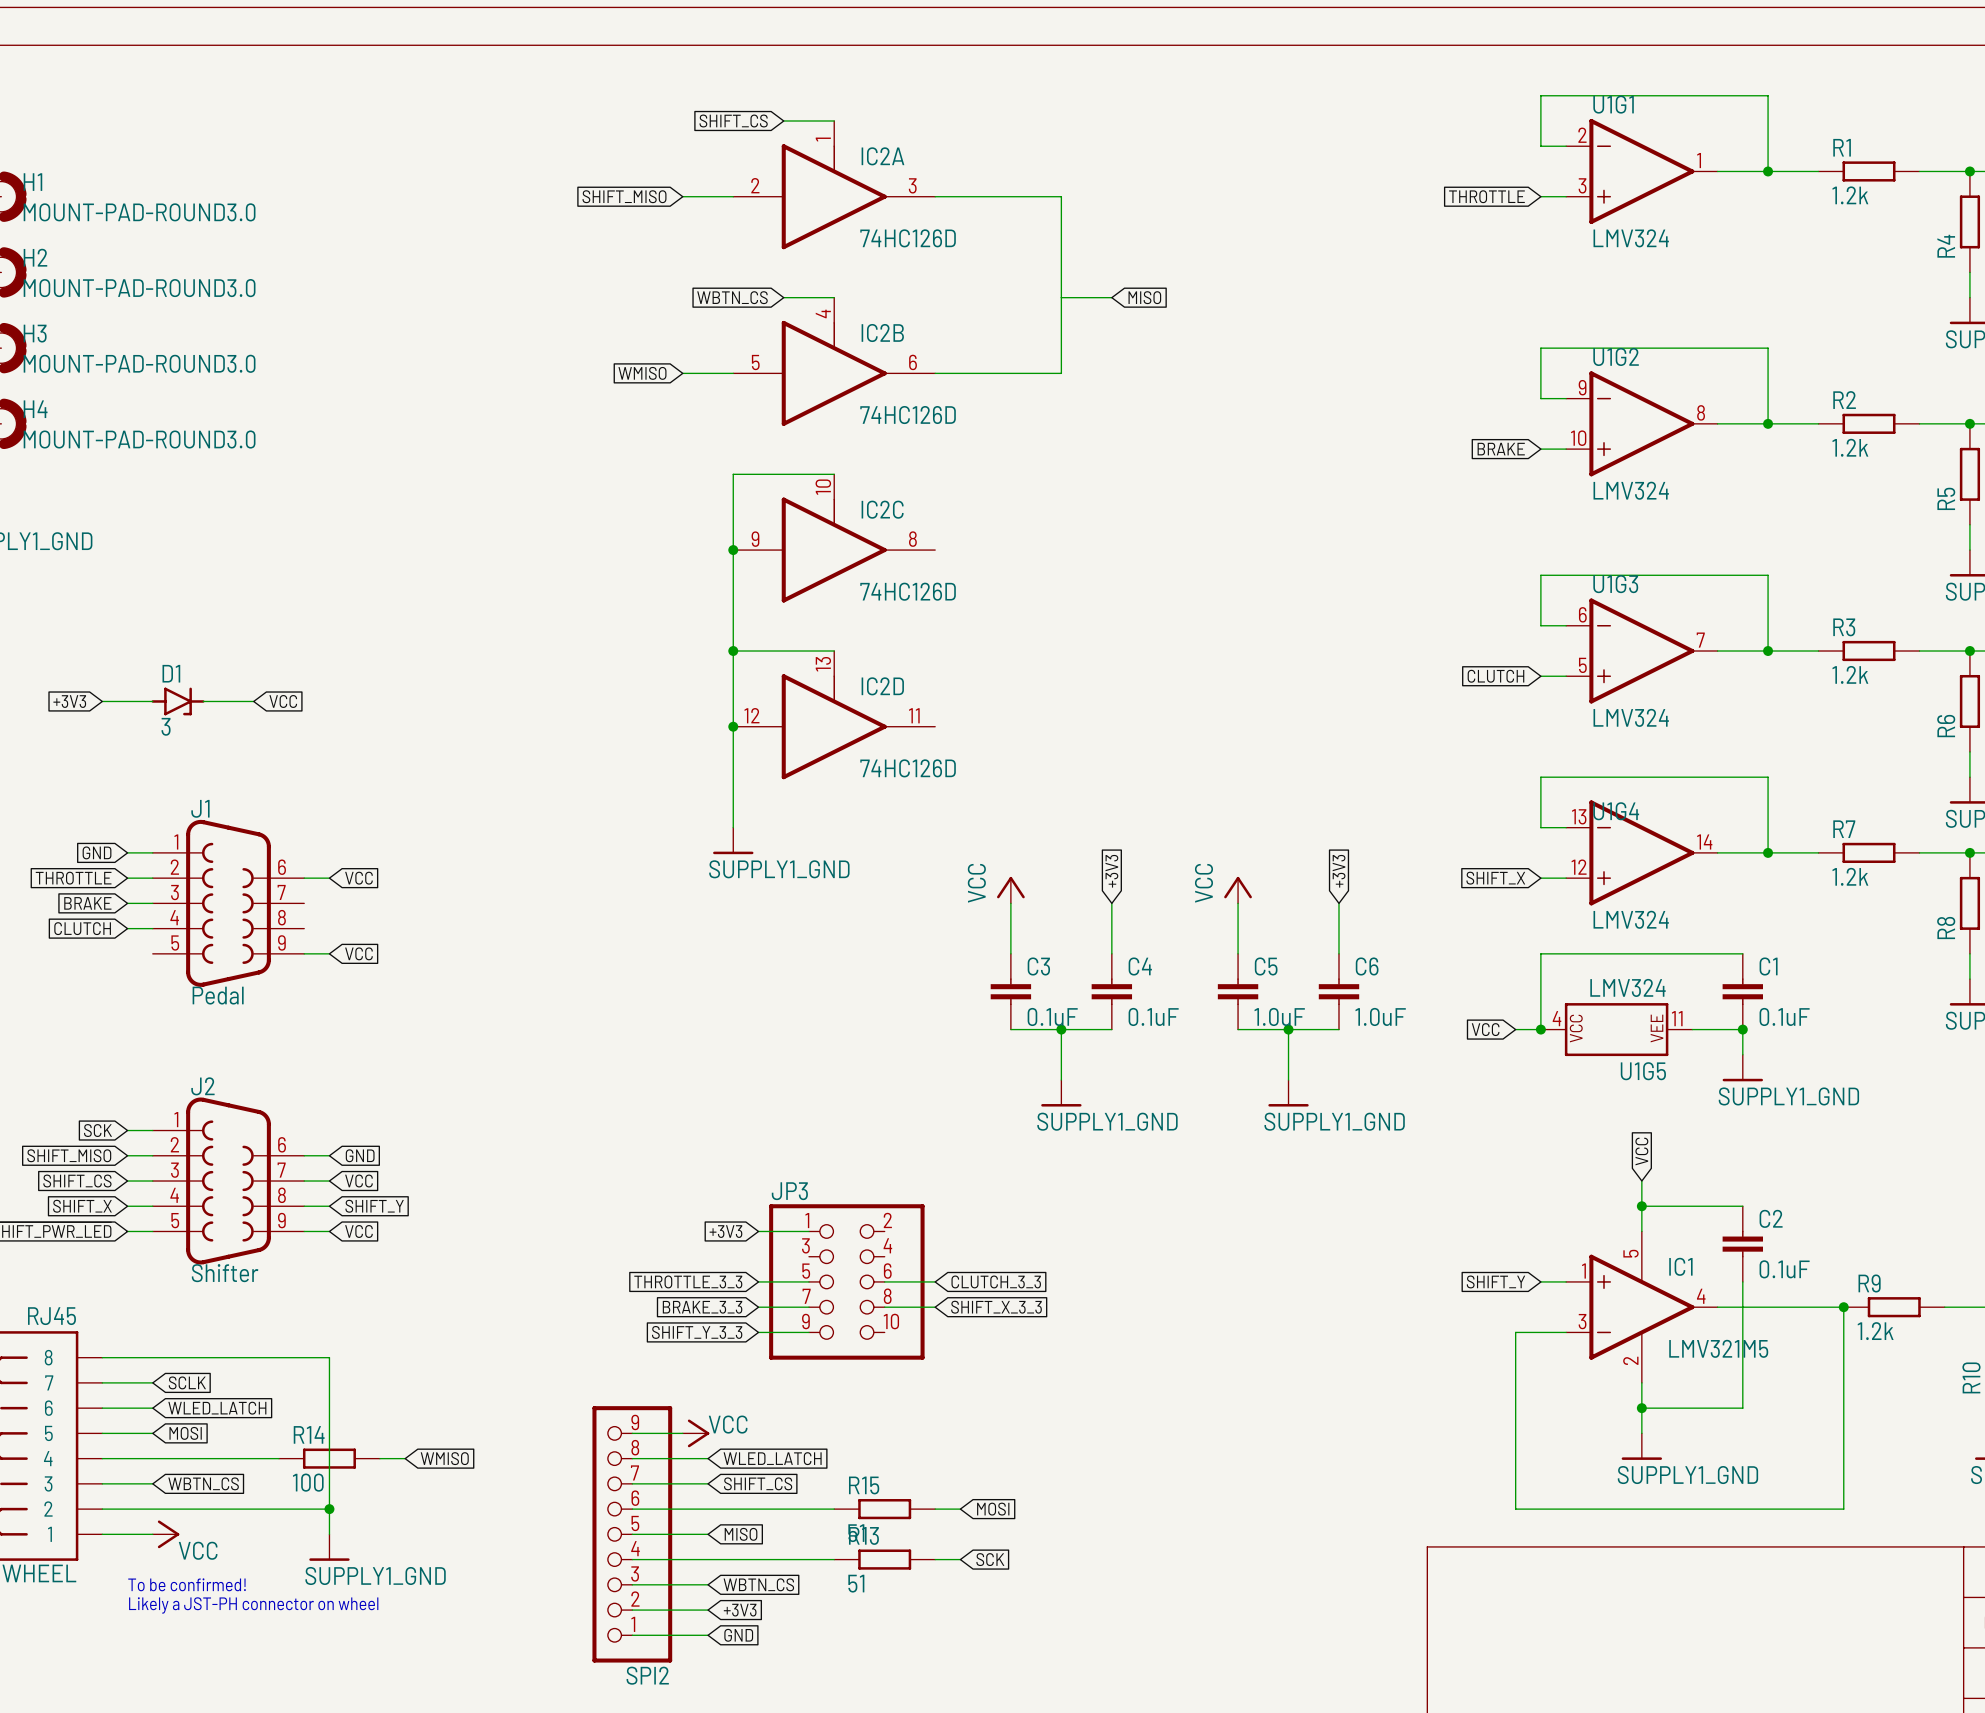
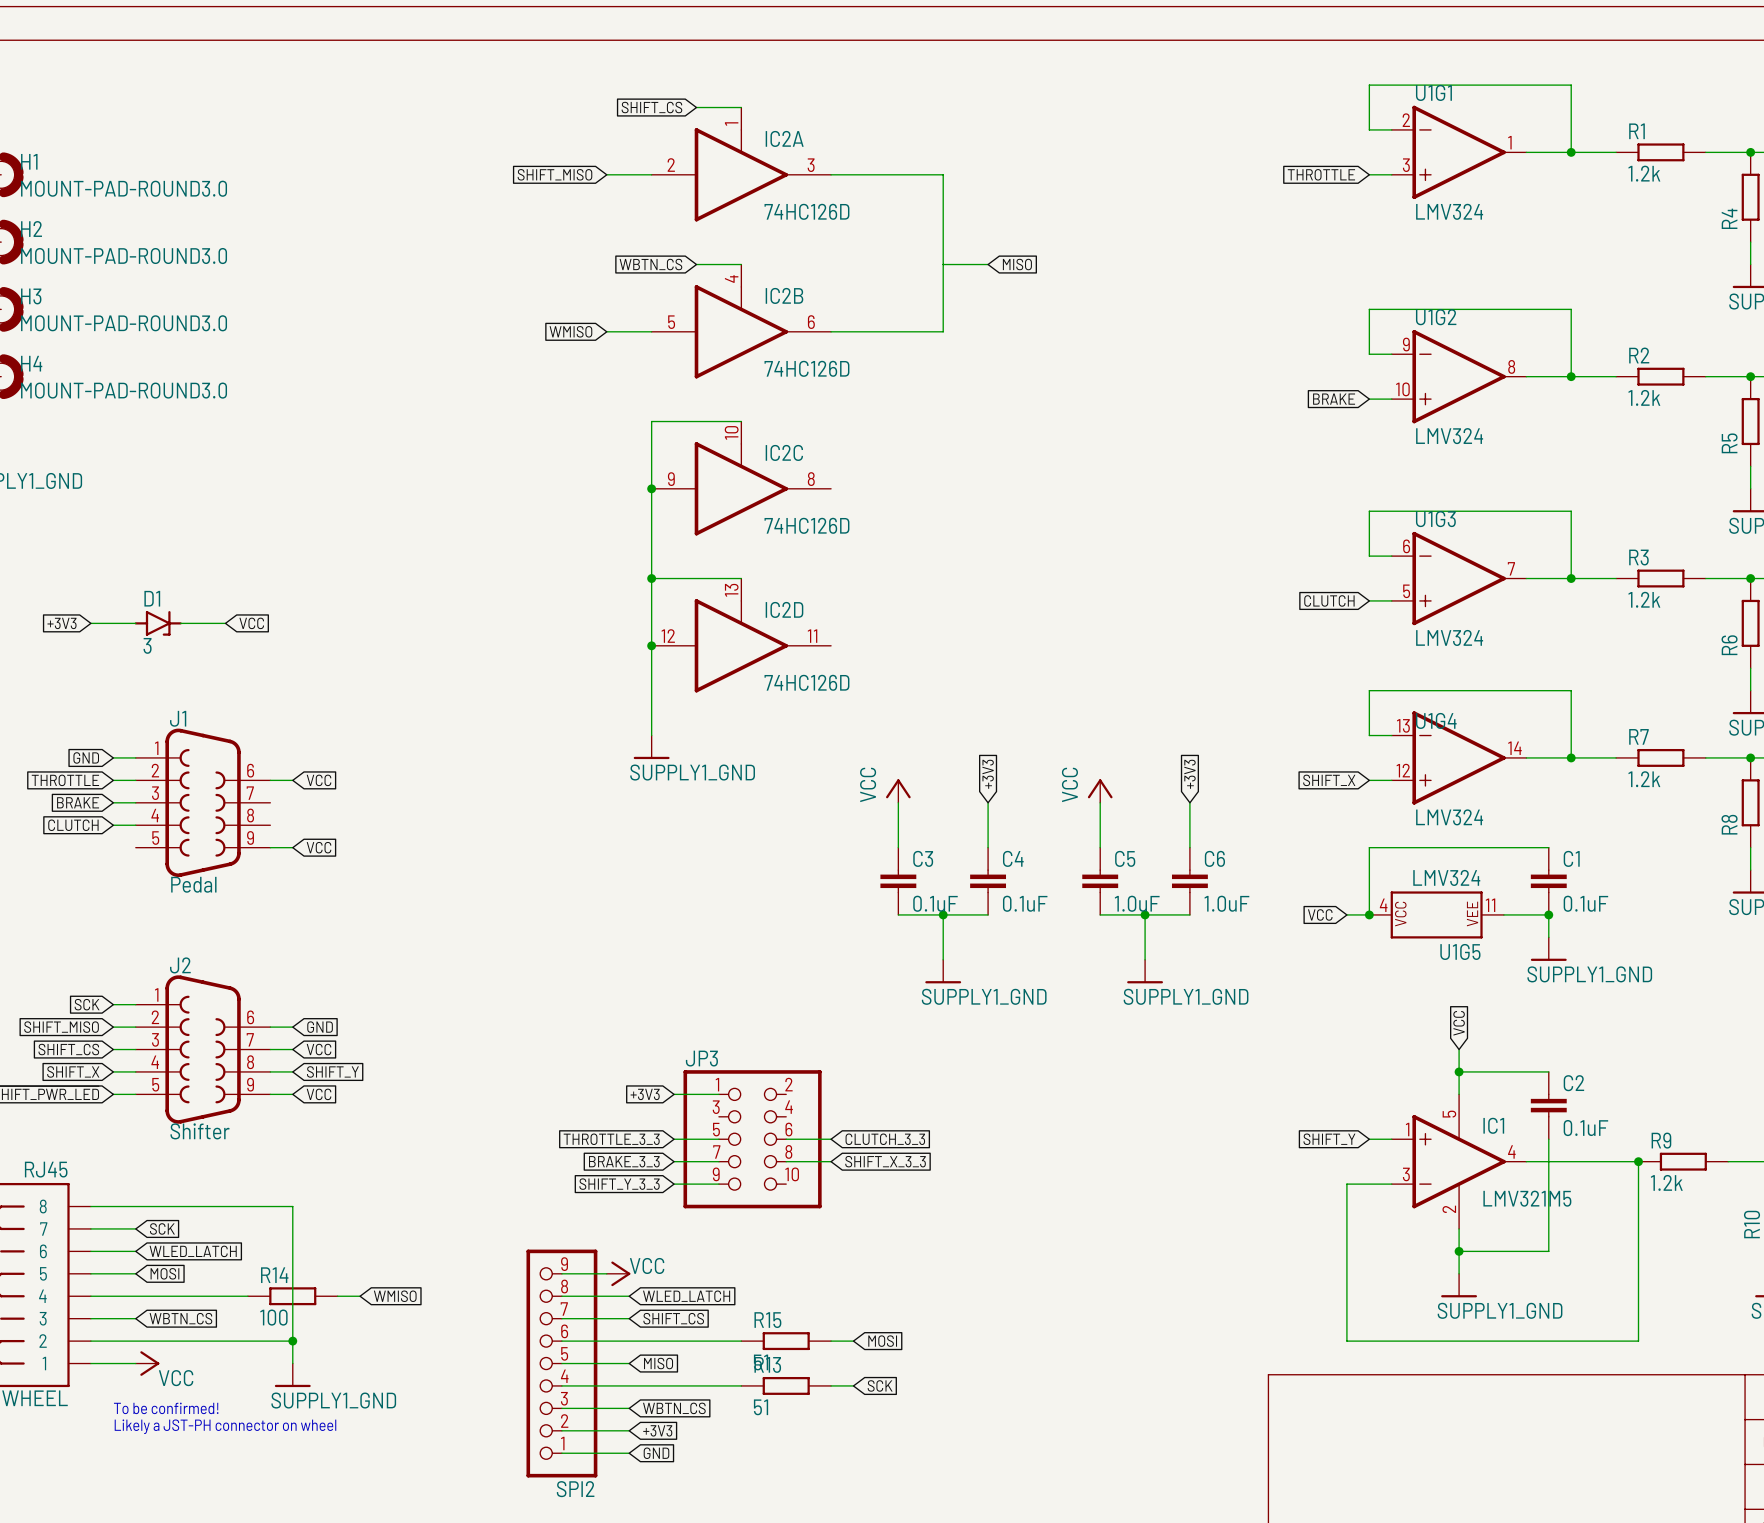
global label: SCLK (187, 1382) -> SCK (162, 1228)

